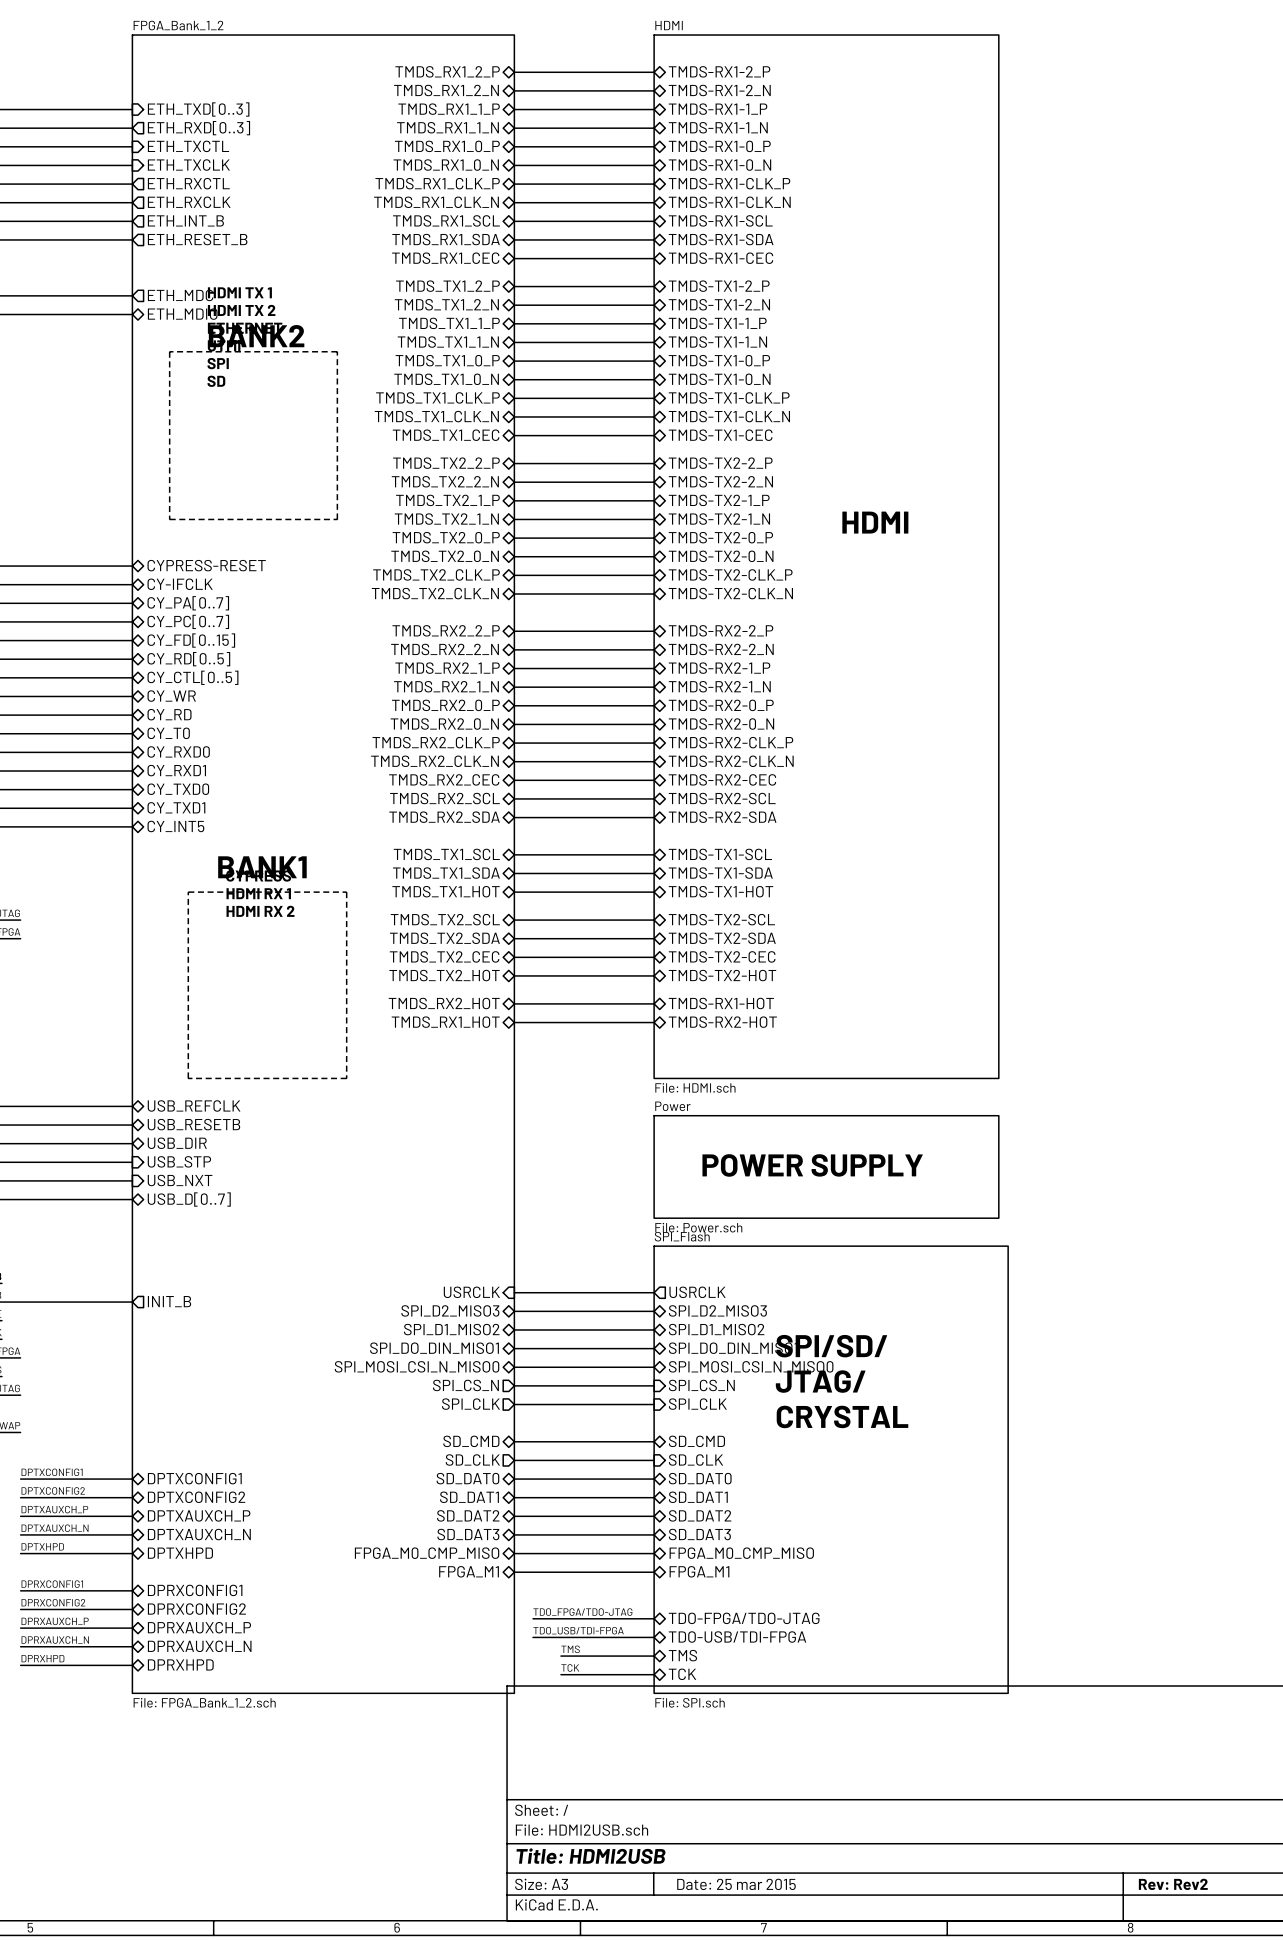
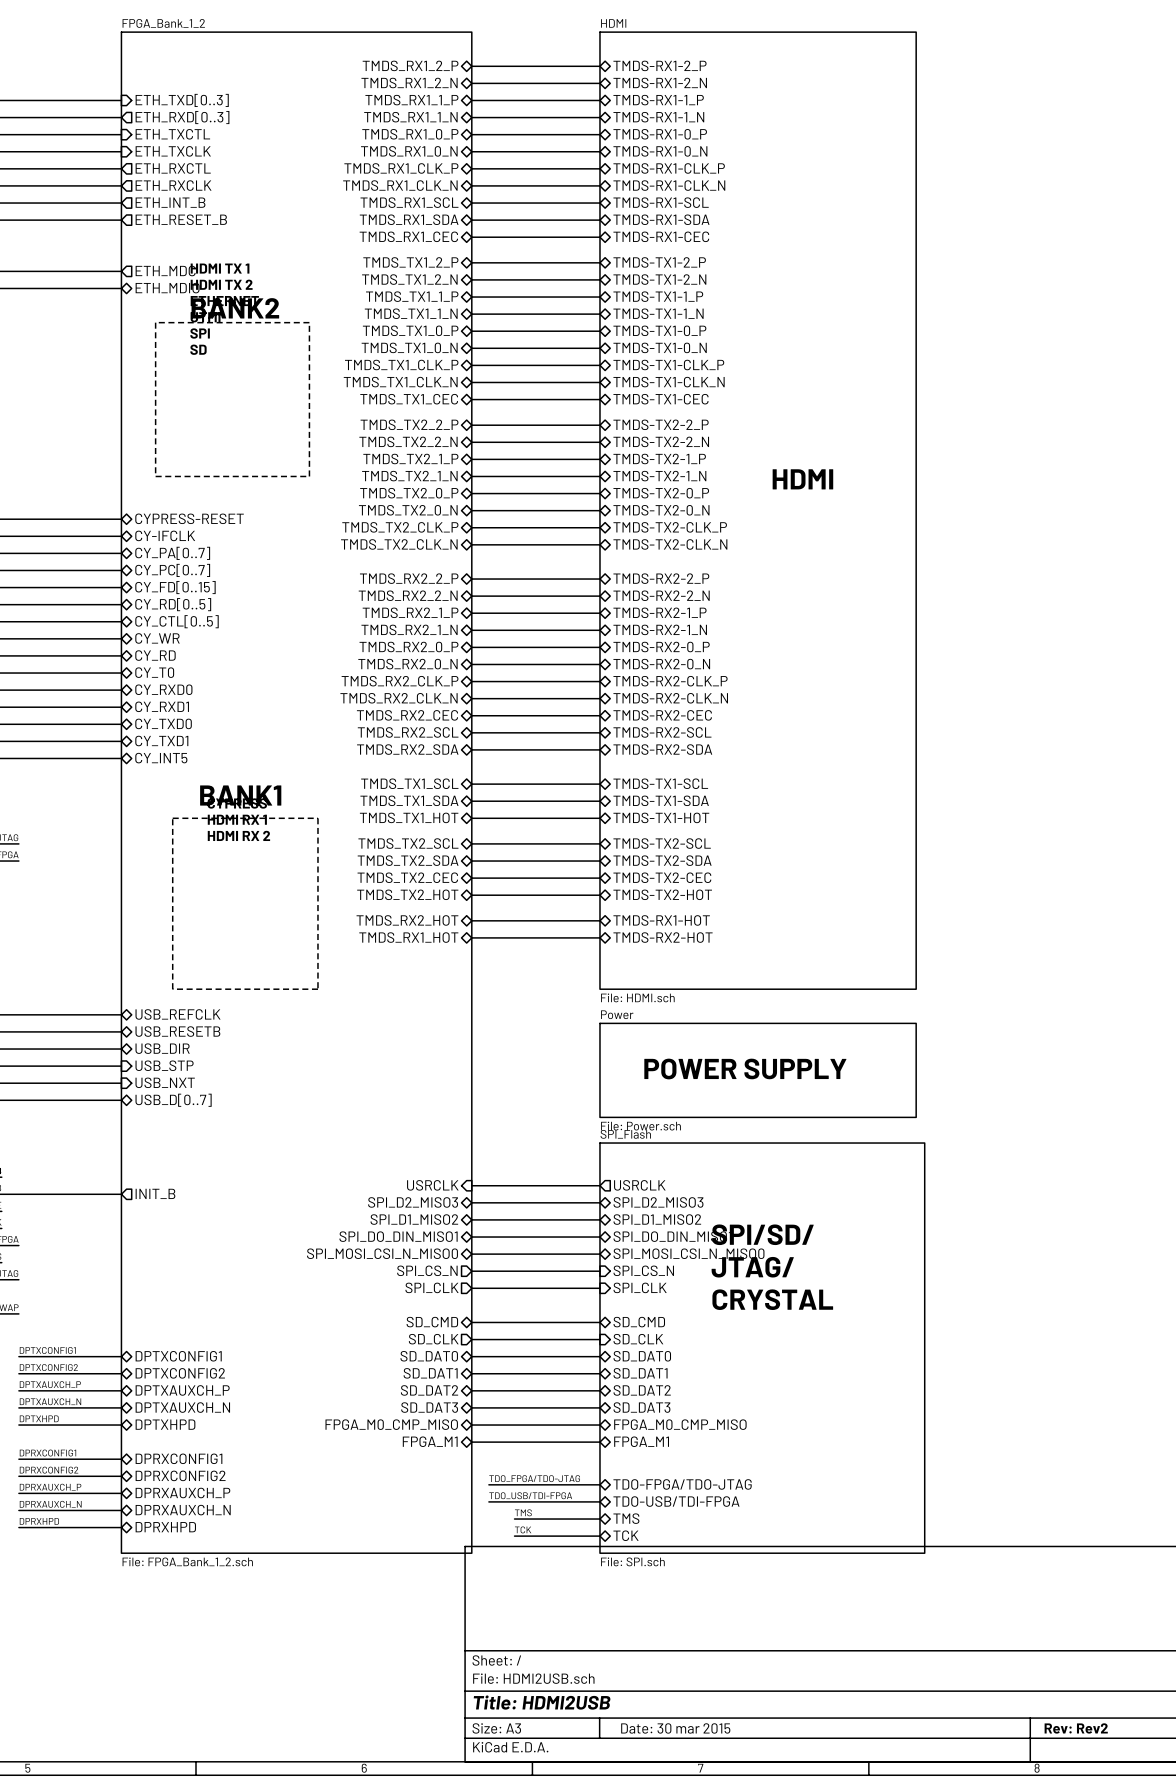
title block: Date: 25 mar 2015 (736, 1884) -> Date: 30 mar 2015 (675, 1728)

